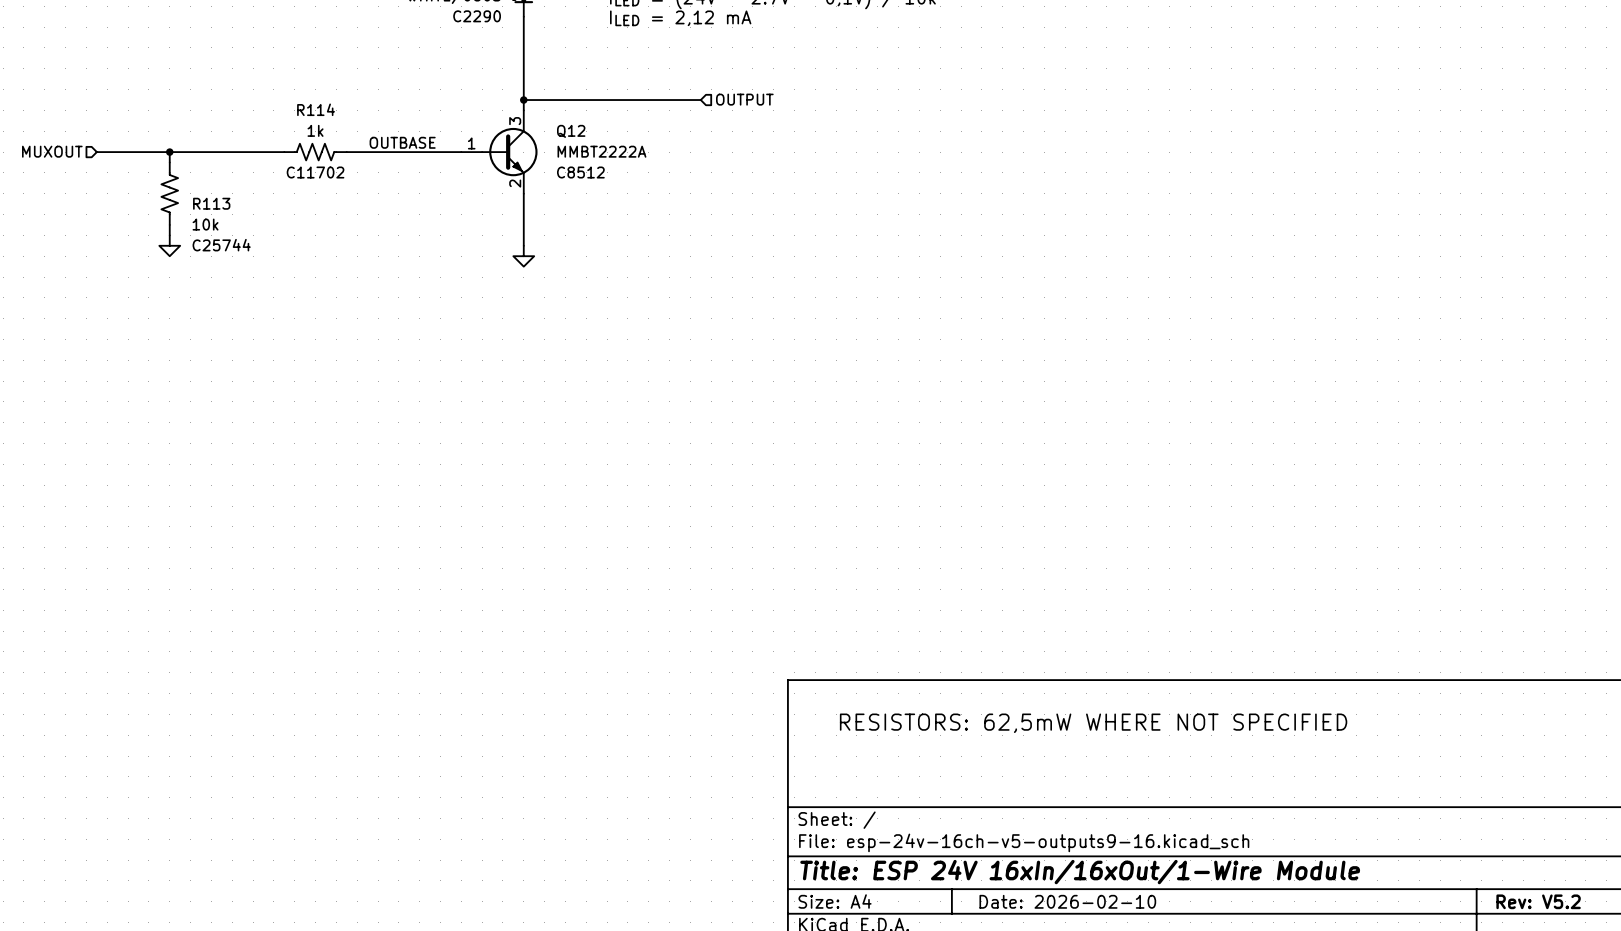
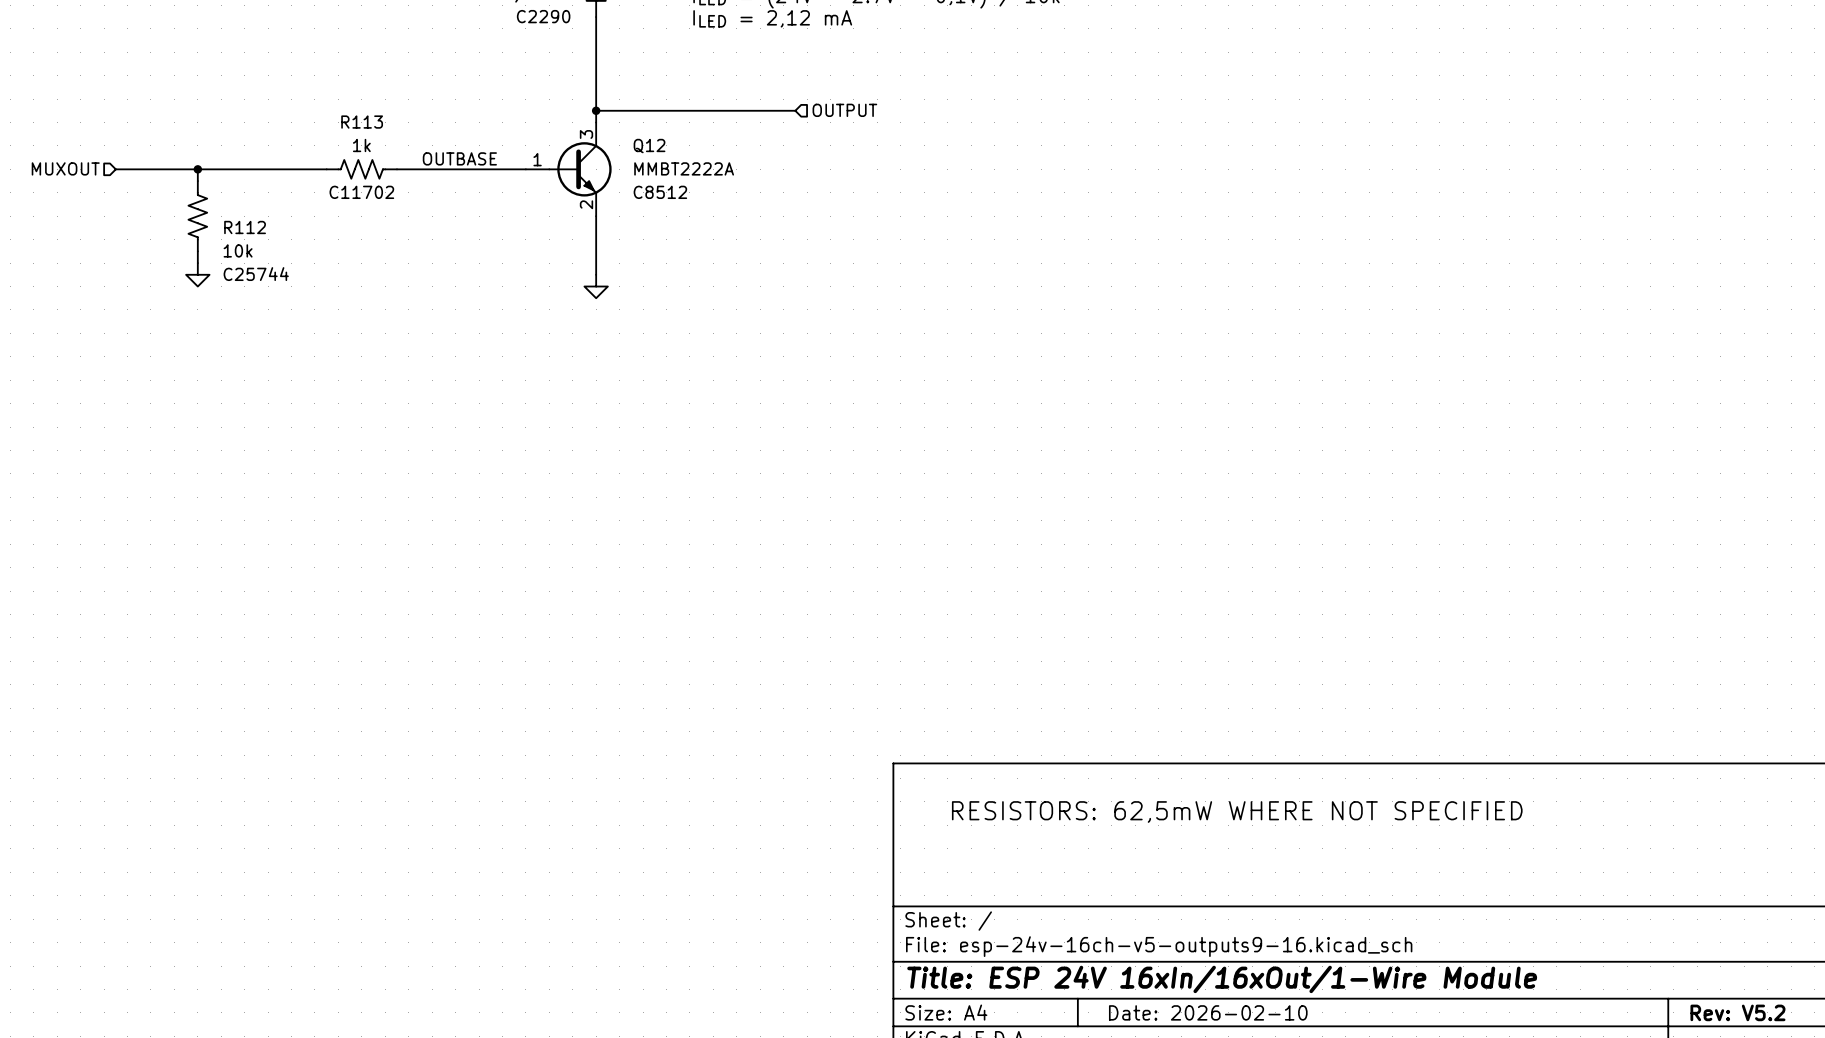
R114 name: R114 (316, 109) -> R113 (362, 122)
R113 name: R113 (211, 203) -> R112 (245, 227)

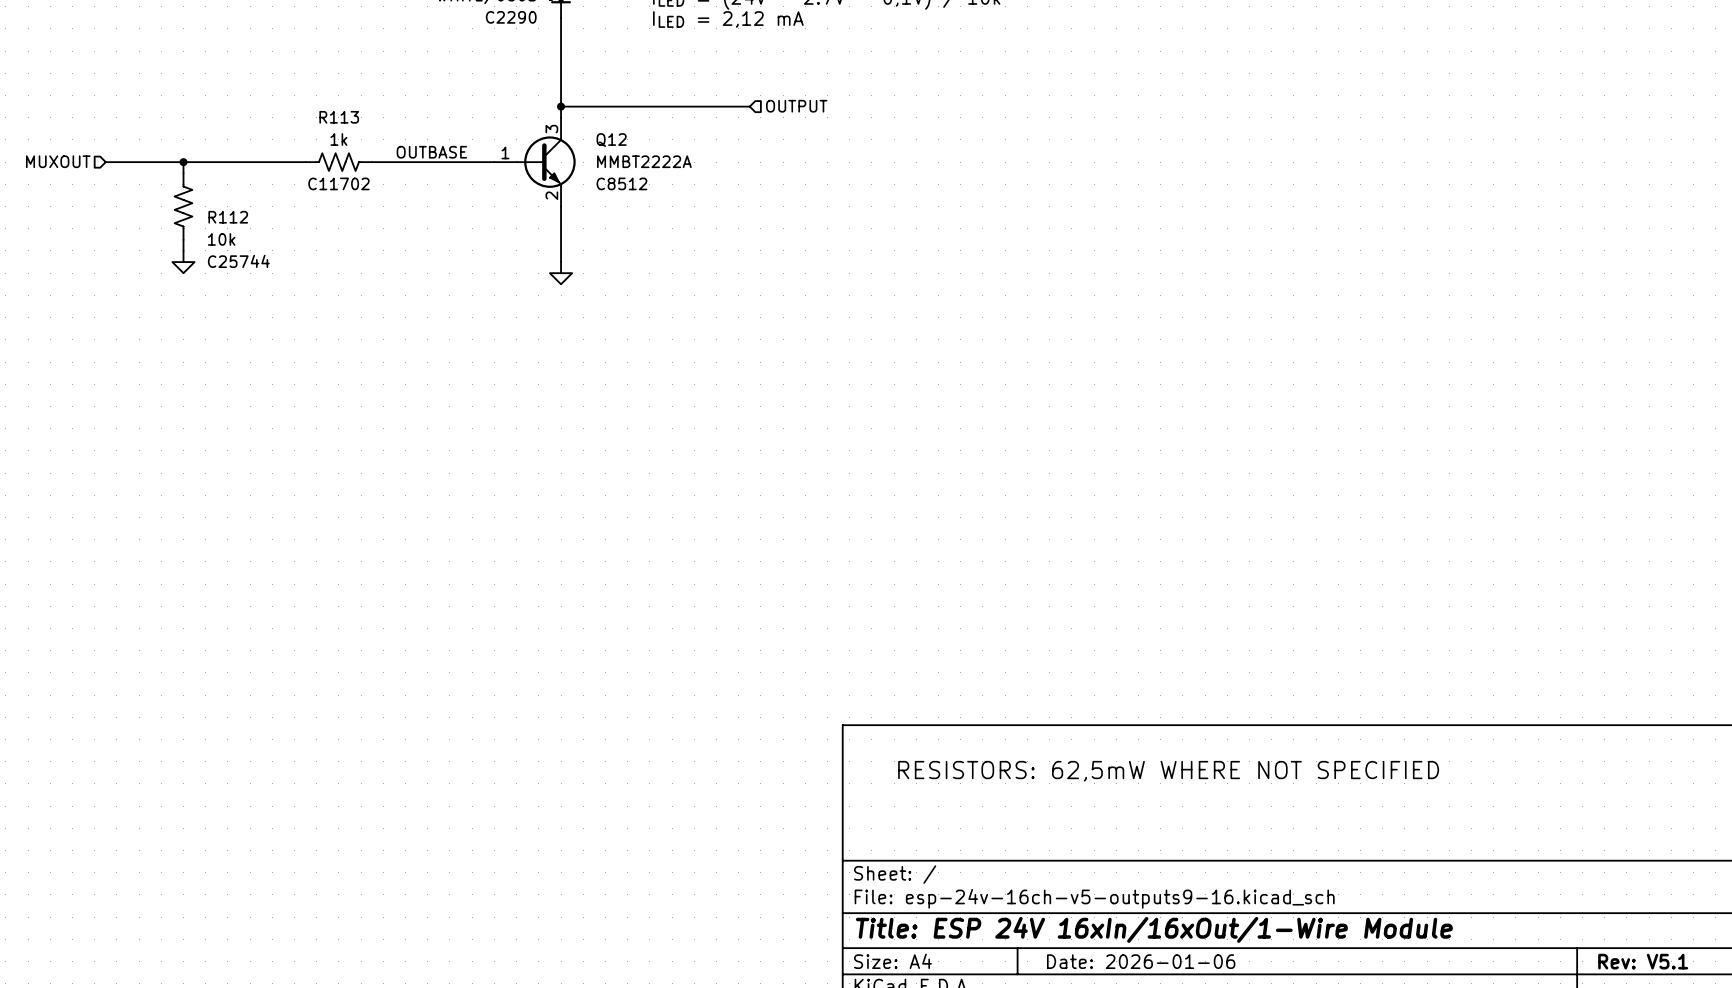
title block: Date: 2026-02-10 (1208, 1012) -> Date: 2026-01-06 (1141, 961)
title block: Rev: V5.2 (1737, 1012) -> Rev: V5.1 (1643, 961)

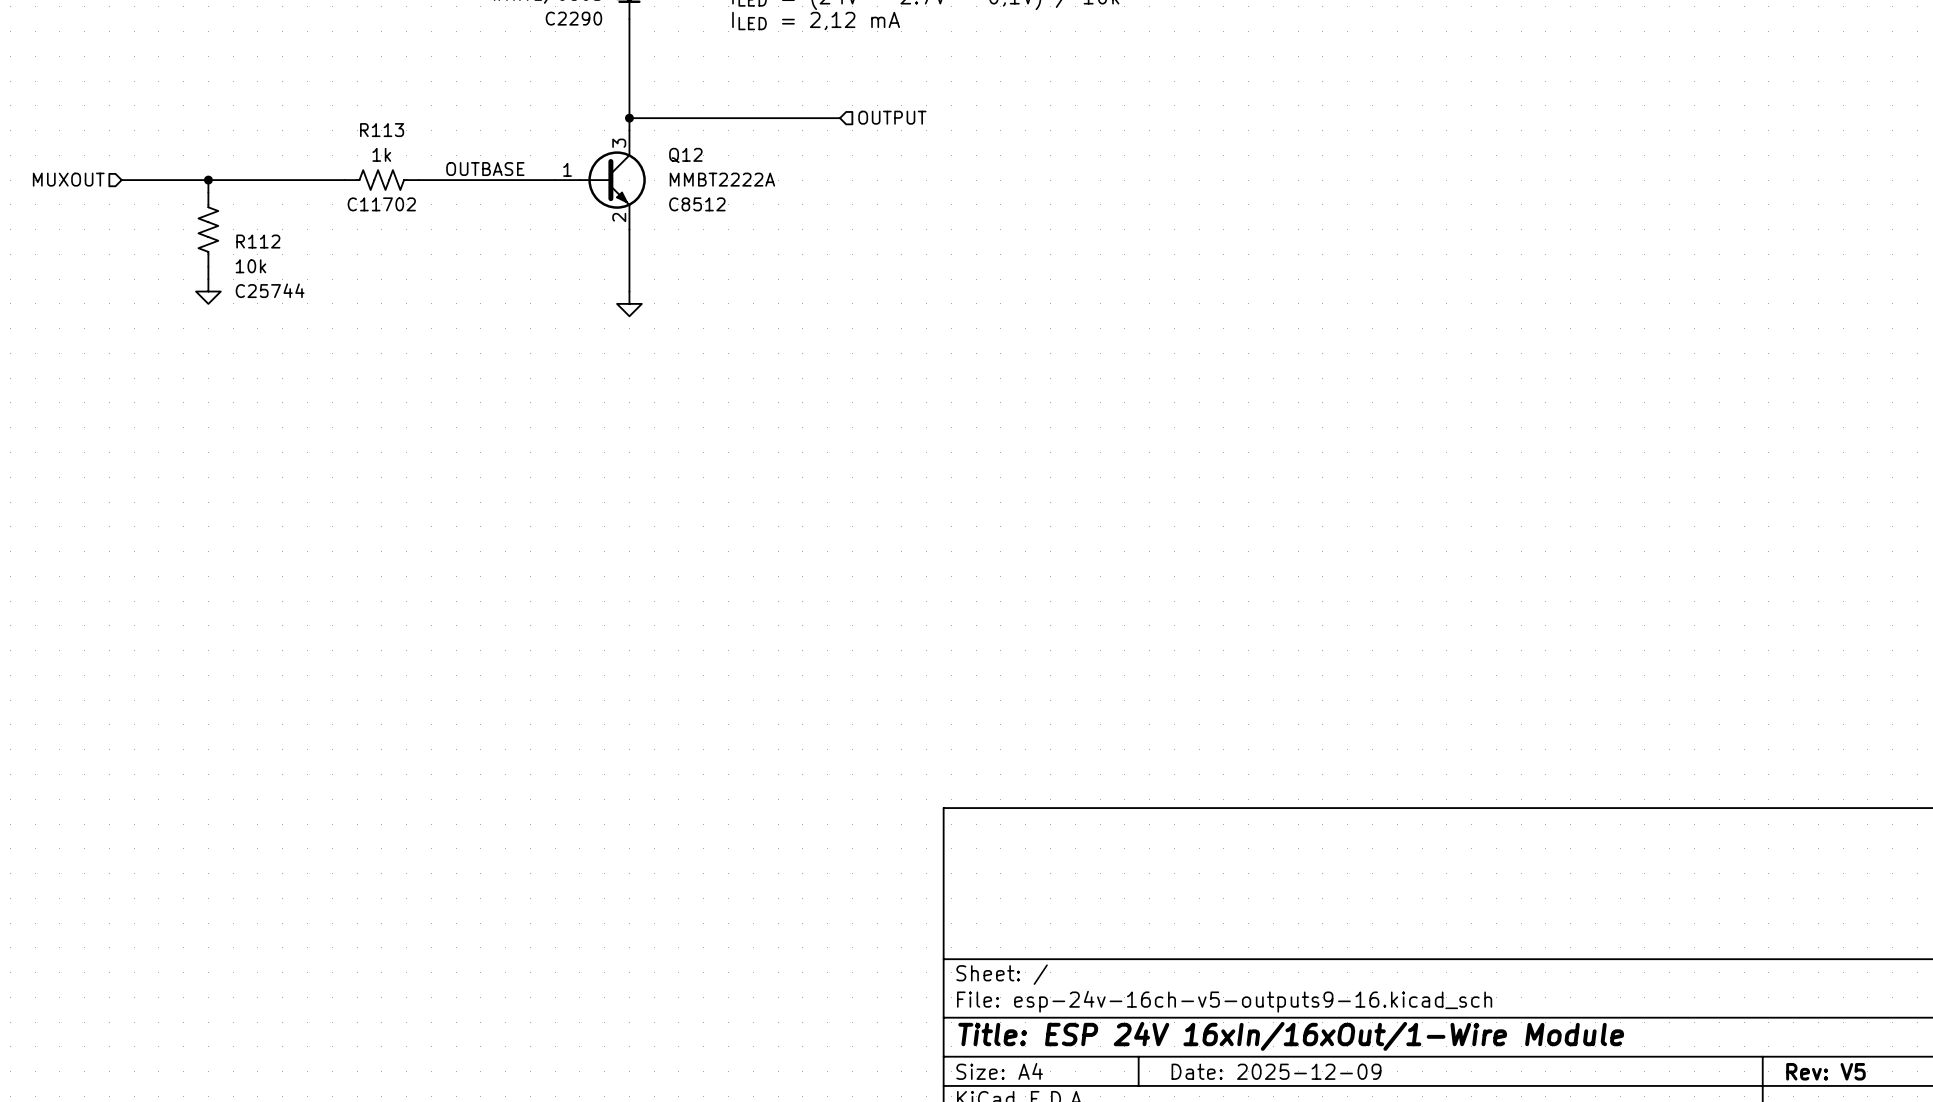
text: RESISTORS: 62,5mW WHERE NOT SPECIFIED (1168, 771) -> none
title block: Date: 2026-01-06 (1141, 961) -> Date: 2025-12-09 (1276, 1071)
title block: Rev: V5.1 (1643, 961) -> Rev: V5 (1825, 1071)

